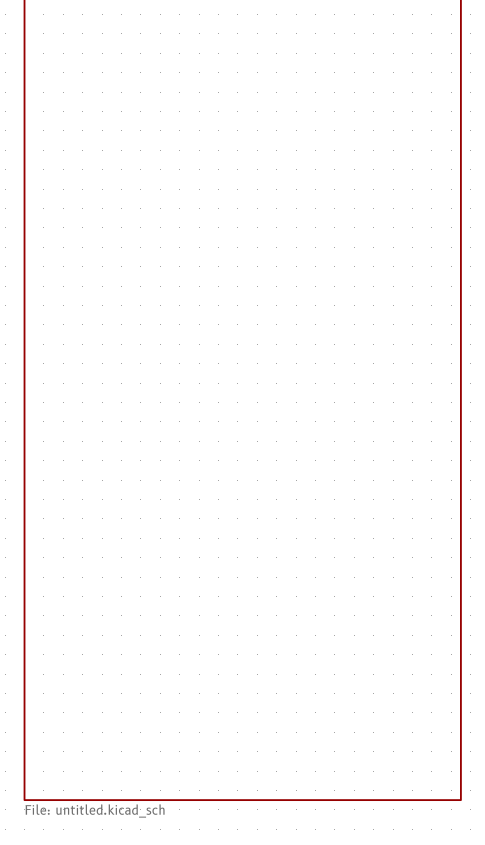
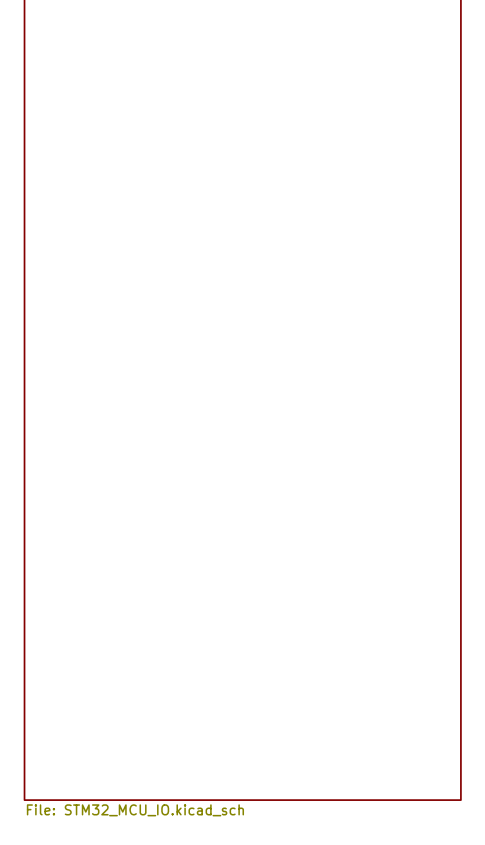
sheet value: File: untitled.kicad_sch (95, 811) -> File: STM32_MCU_IO.kicad_sch (135, 810)

